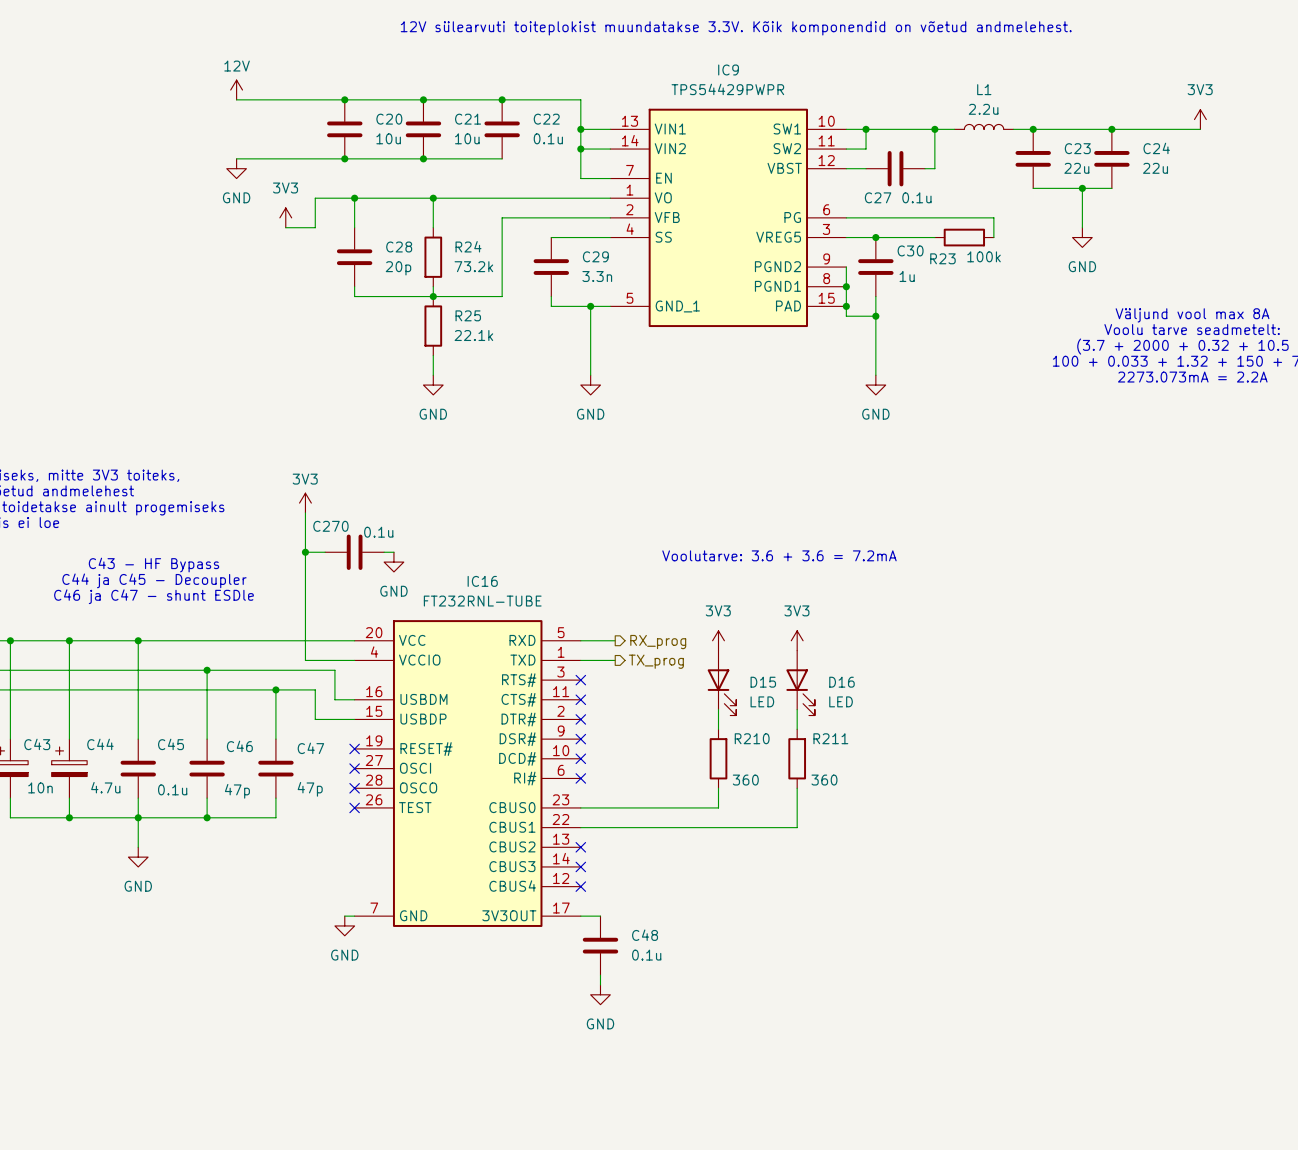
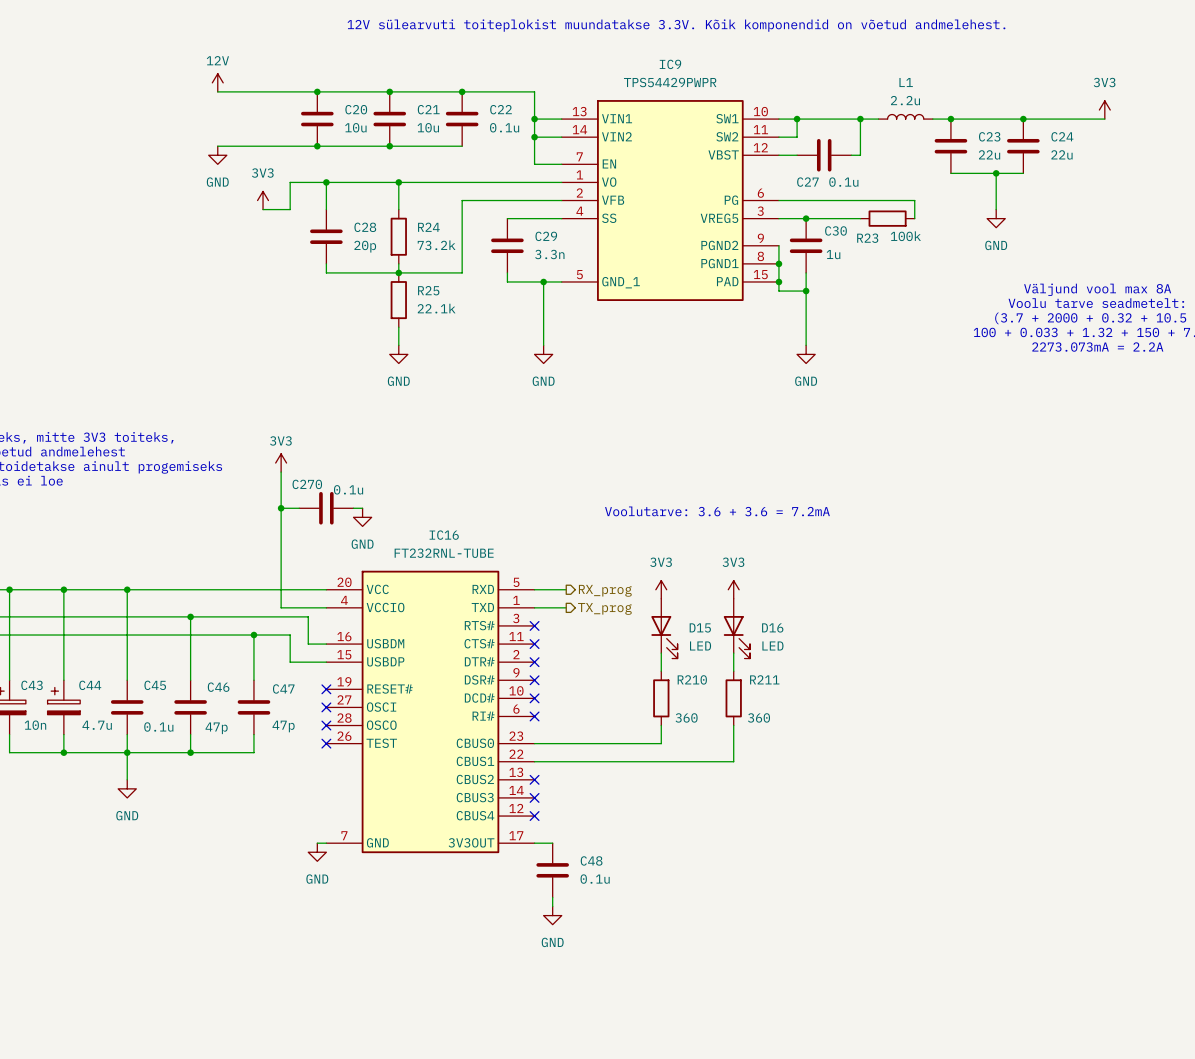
text: C43 - HF Bypass (153, 565) -> none
text: C44 ja C45 - Decoupler (154, 580) -> none
text: C46 ja C47 - shunt ESDle (153, 596) -> none

